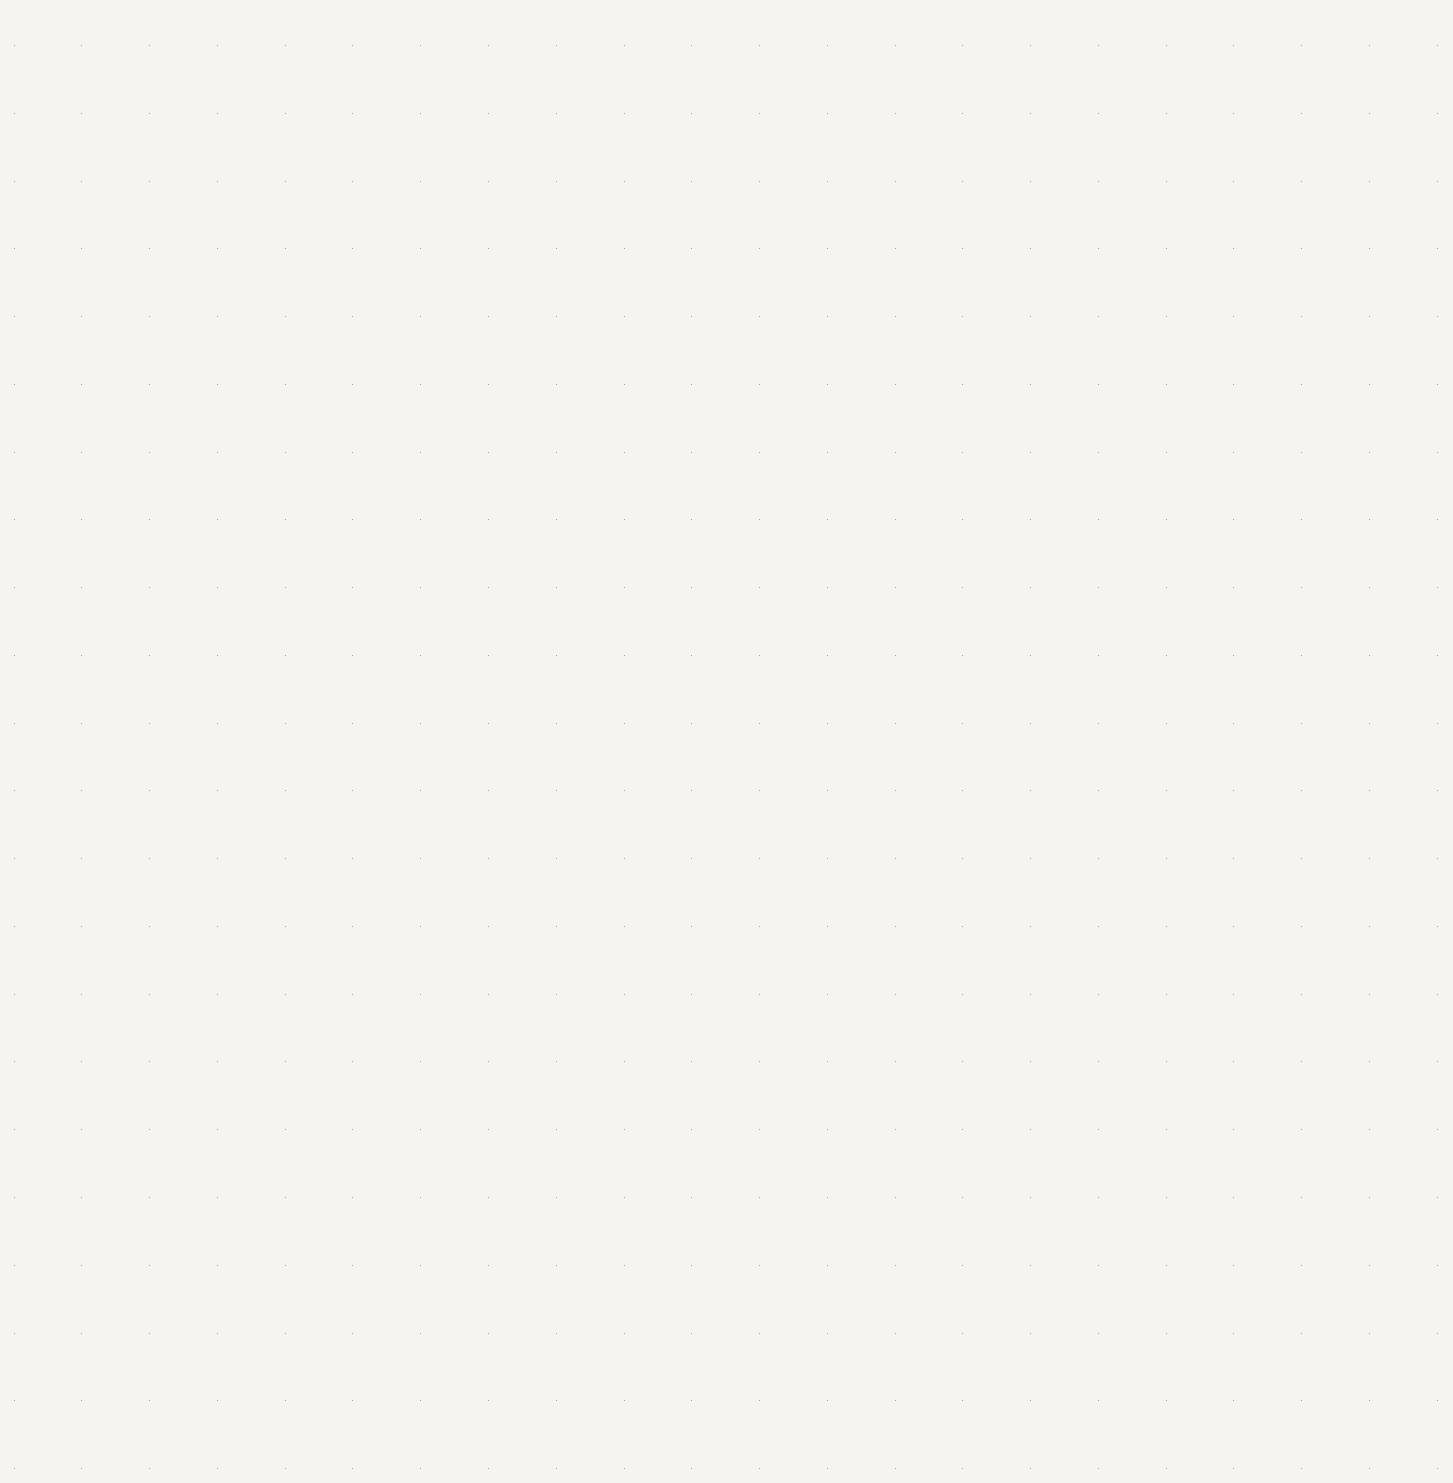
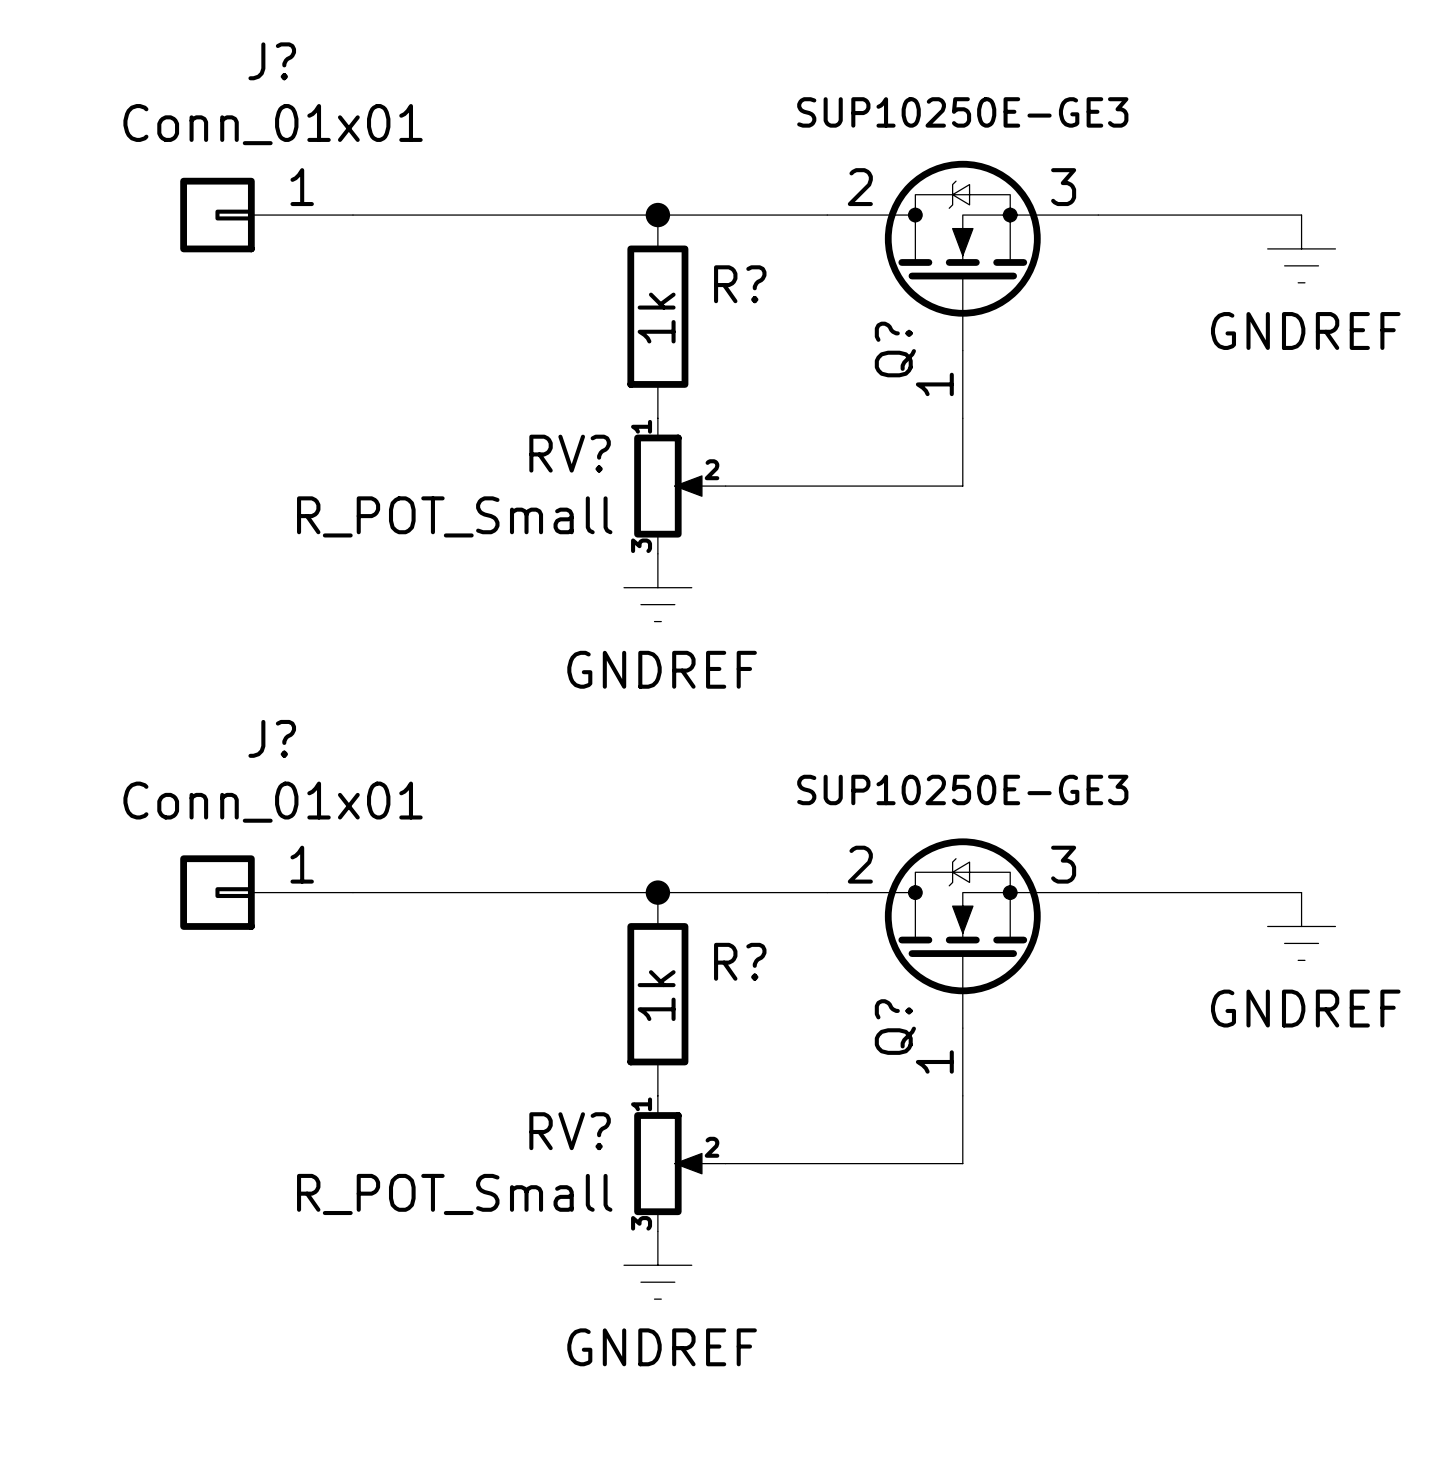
J?: none -> Conn_01x01 (266, 215)
wire: none -> (352, 215) (827, 215)
junction: none -> (657, 215)
wire: none -> (1098, 215) (1301, 215)
power symbol: none -> GNDREF (1301, 248)
Q?: none -> (962, 289)
R?: none -> 1k (657, 316)
wire: none -> (962, 418) (962, 486) (725, 486)
RV?: none -> R_POT_Small (679, 486)
power symbol: none -> GNDREF (657, 587)
J?: none -> Conn_01x01 (266, 892)
wire: none -> (352, 892) (827, 892)
junction: none -> (657, 892)
wire: none -> (1098, 892) (1301, 892)
power symbol: none -> GNDREF (1301, 926)
Q?: none -> (962, 967)
R?: none -> 1k (657, 994)
wire: none -> (962, 1095) (962, 1163) (725, 1163)
RV?: none -> R_POT_Small (679, 1163)
power symbol: none -> GNDREF (657, 1265)

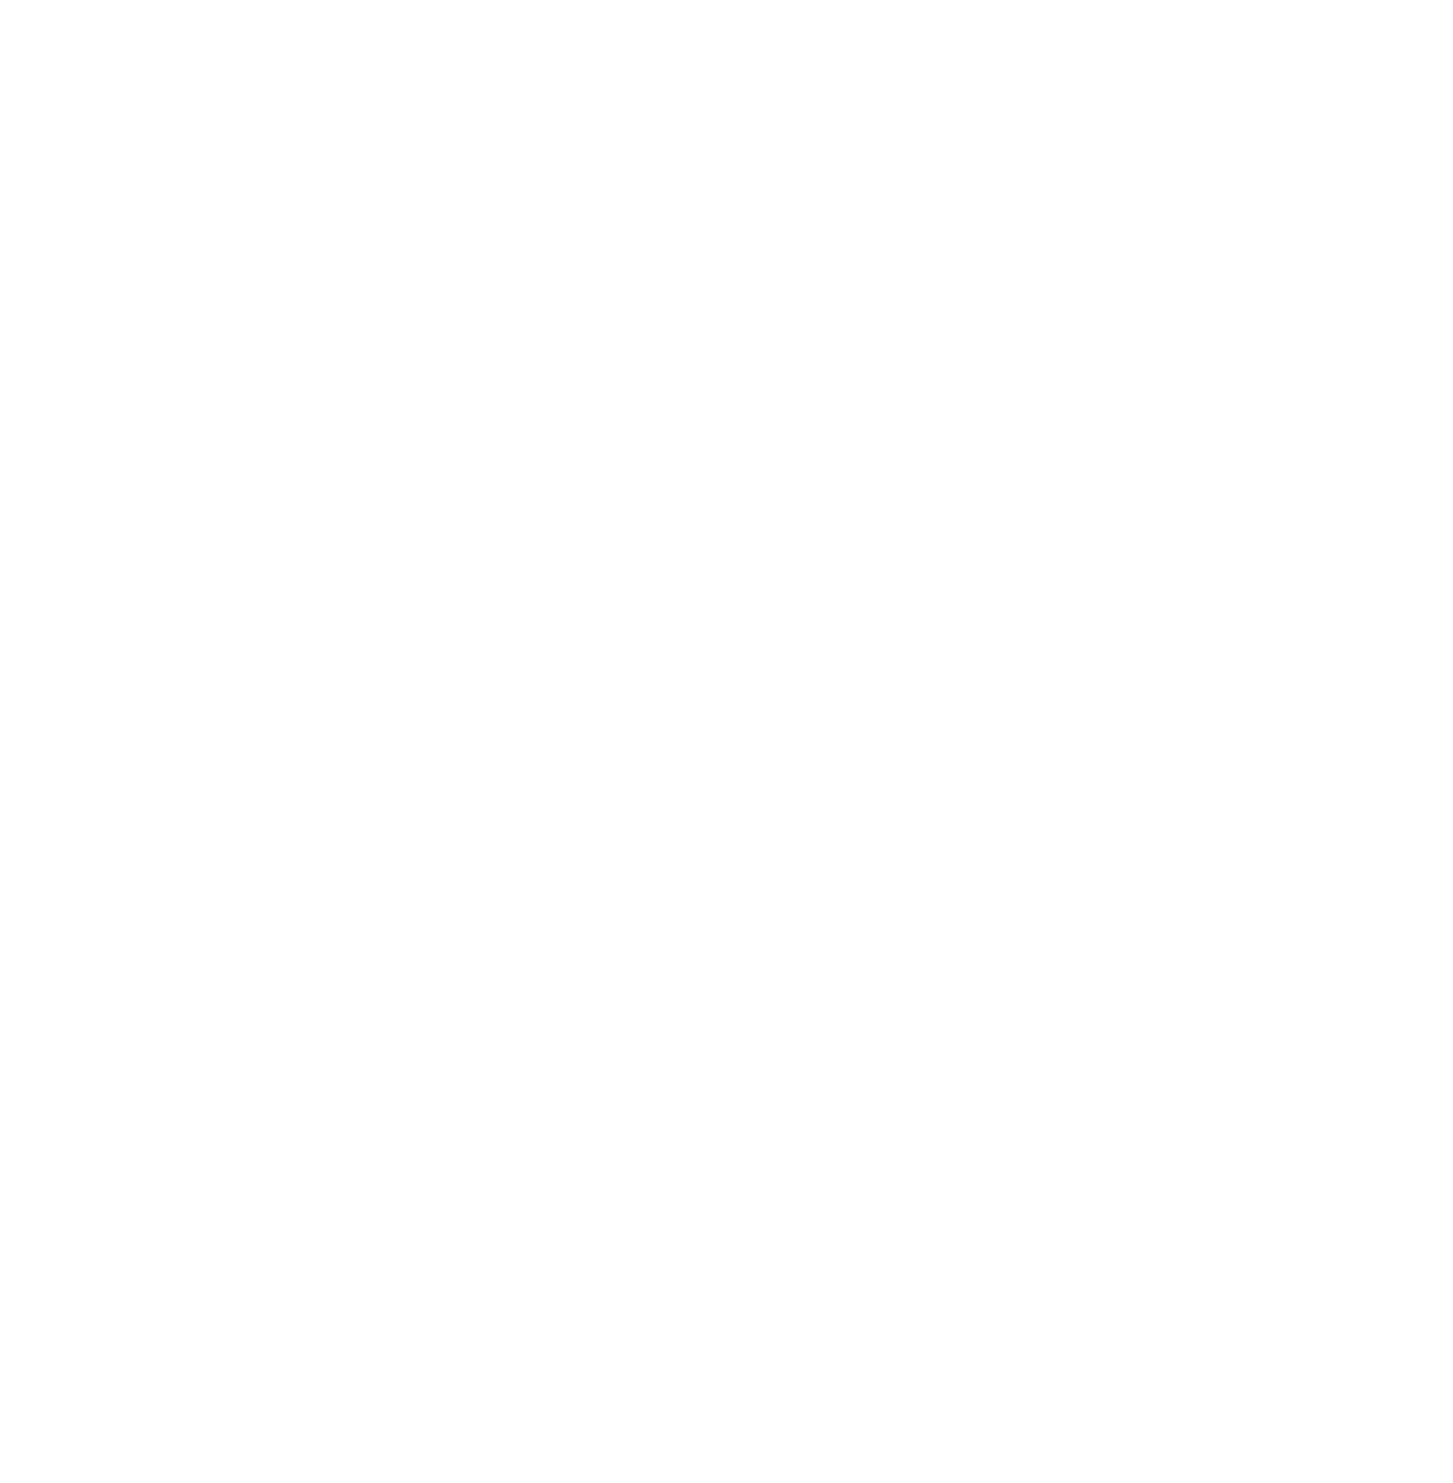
J?: Conn_01x01 (266, 215) -> none
wire: (352, 215) (827, 215) -> none
junction: (657, 215) -> none
wire: (1098, 215) (1301, 215) -> none
power symbol: GNDREF (1301, 248) -> none
Q?: (962, 289) -> none
R?: 1k (657, 316) -> none
wire: (962, 418) (962, 486) (725, 486) -> none
RV?: R_POT_Small (679, 486) -> none
power symbol: GNDREF (657, 587) -> none
J?: Conn_01x01 (266, 892) -> none
wire: (352, 892) (827, 892) -> none
junction: (657, 892) -> none
wire: (1098, 892) (1301, 892) -> none
power symbol: GNDREF (1301, 926) -> none
Q?: (962, 967) -> none
R?: 1k (657, 994) -> none
wire: (962, 1095) (962, 1163) (725, 1163) -> none
RV?: R_POT_Small (679, 1163) -> none
power symbol: GNDREF (657, 1265) -> none

